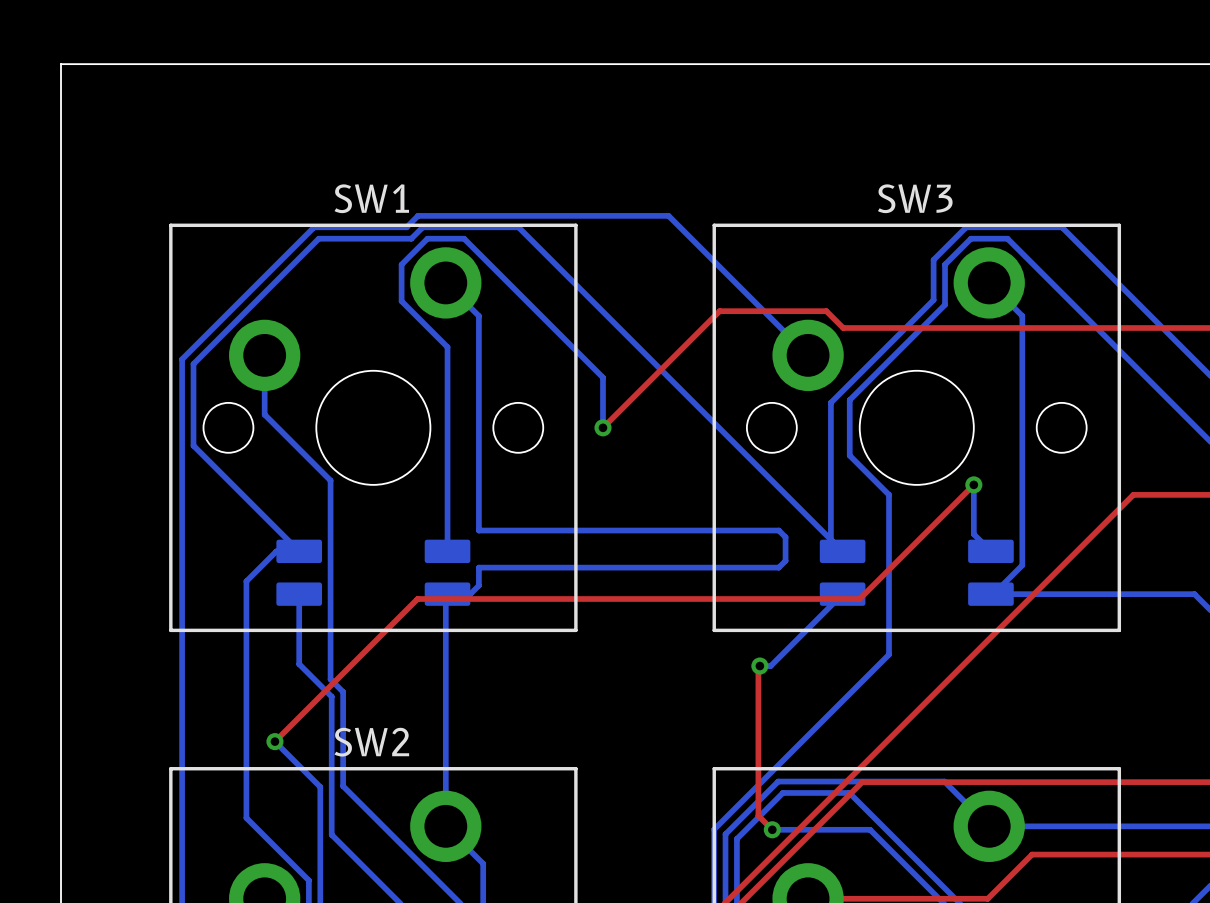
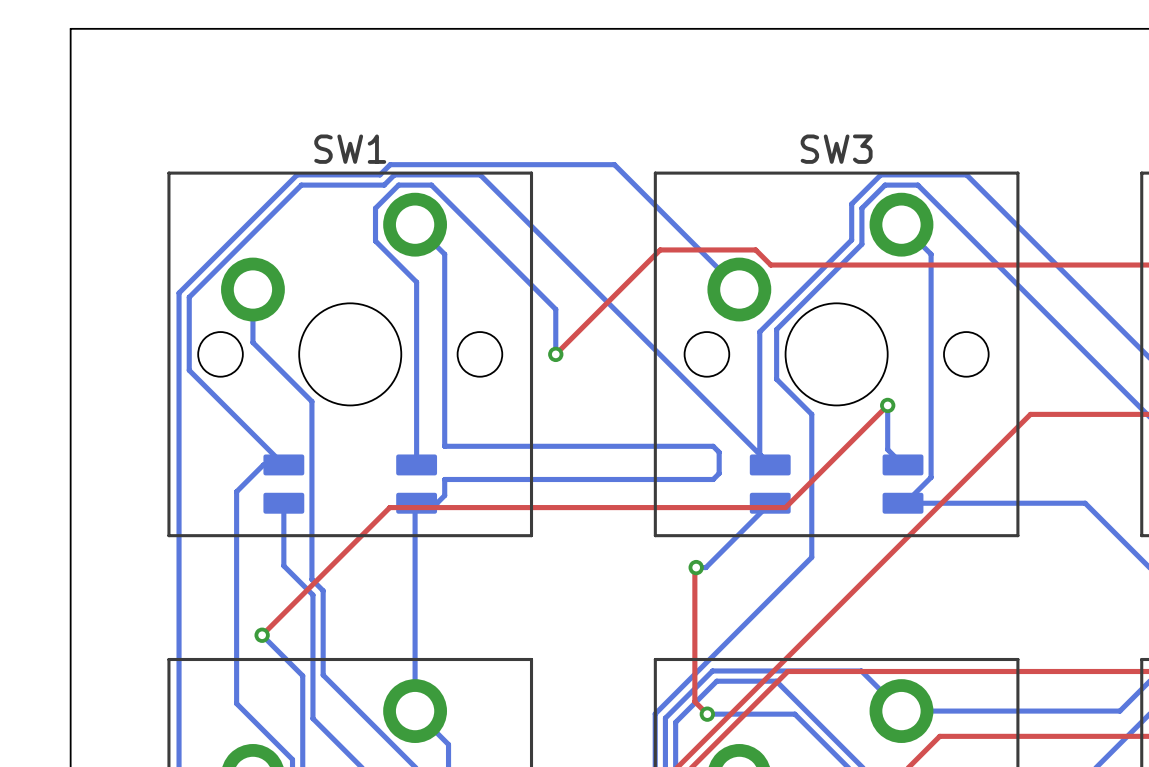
SW2 name: SW2 (371, 742) -> none

